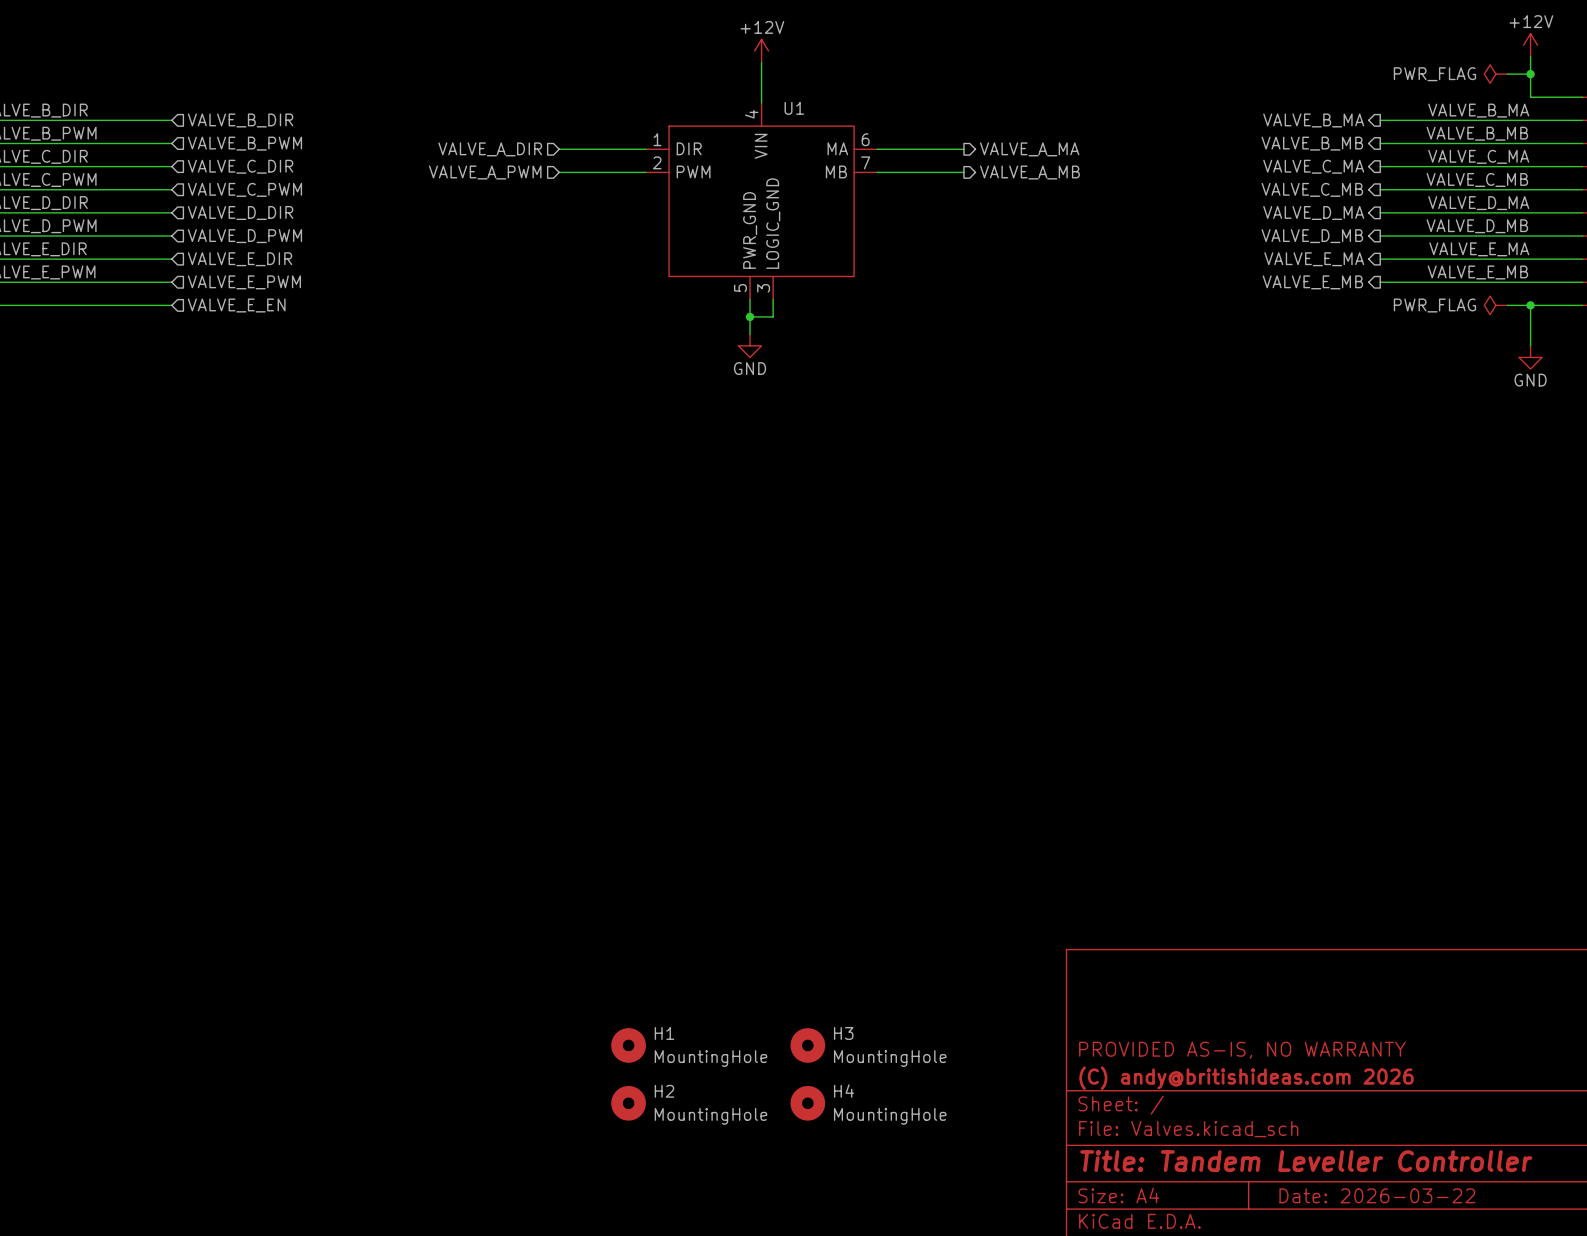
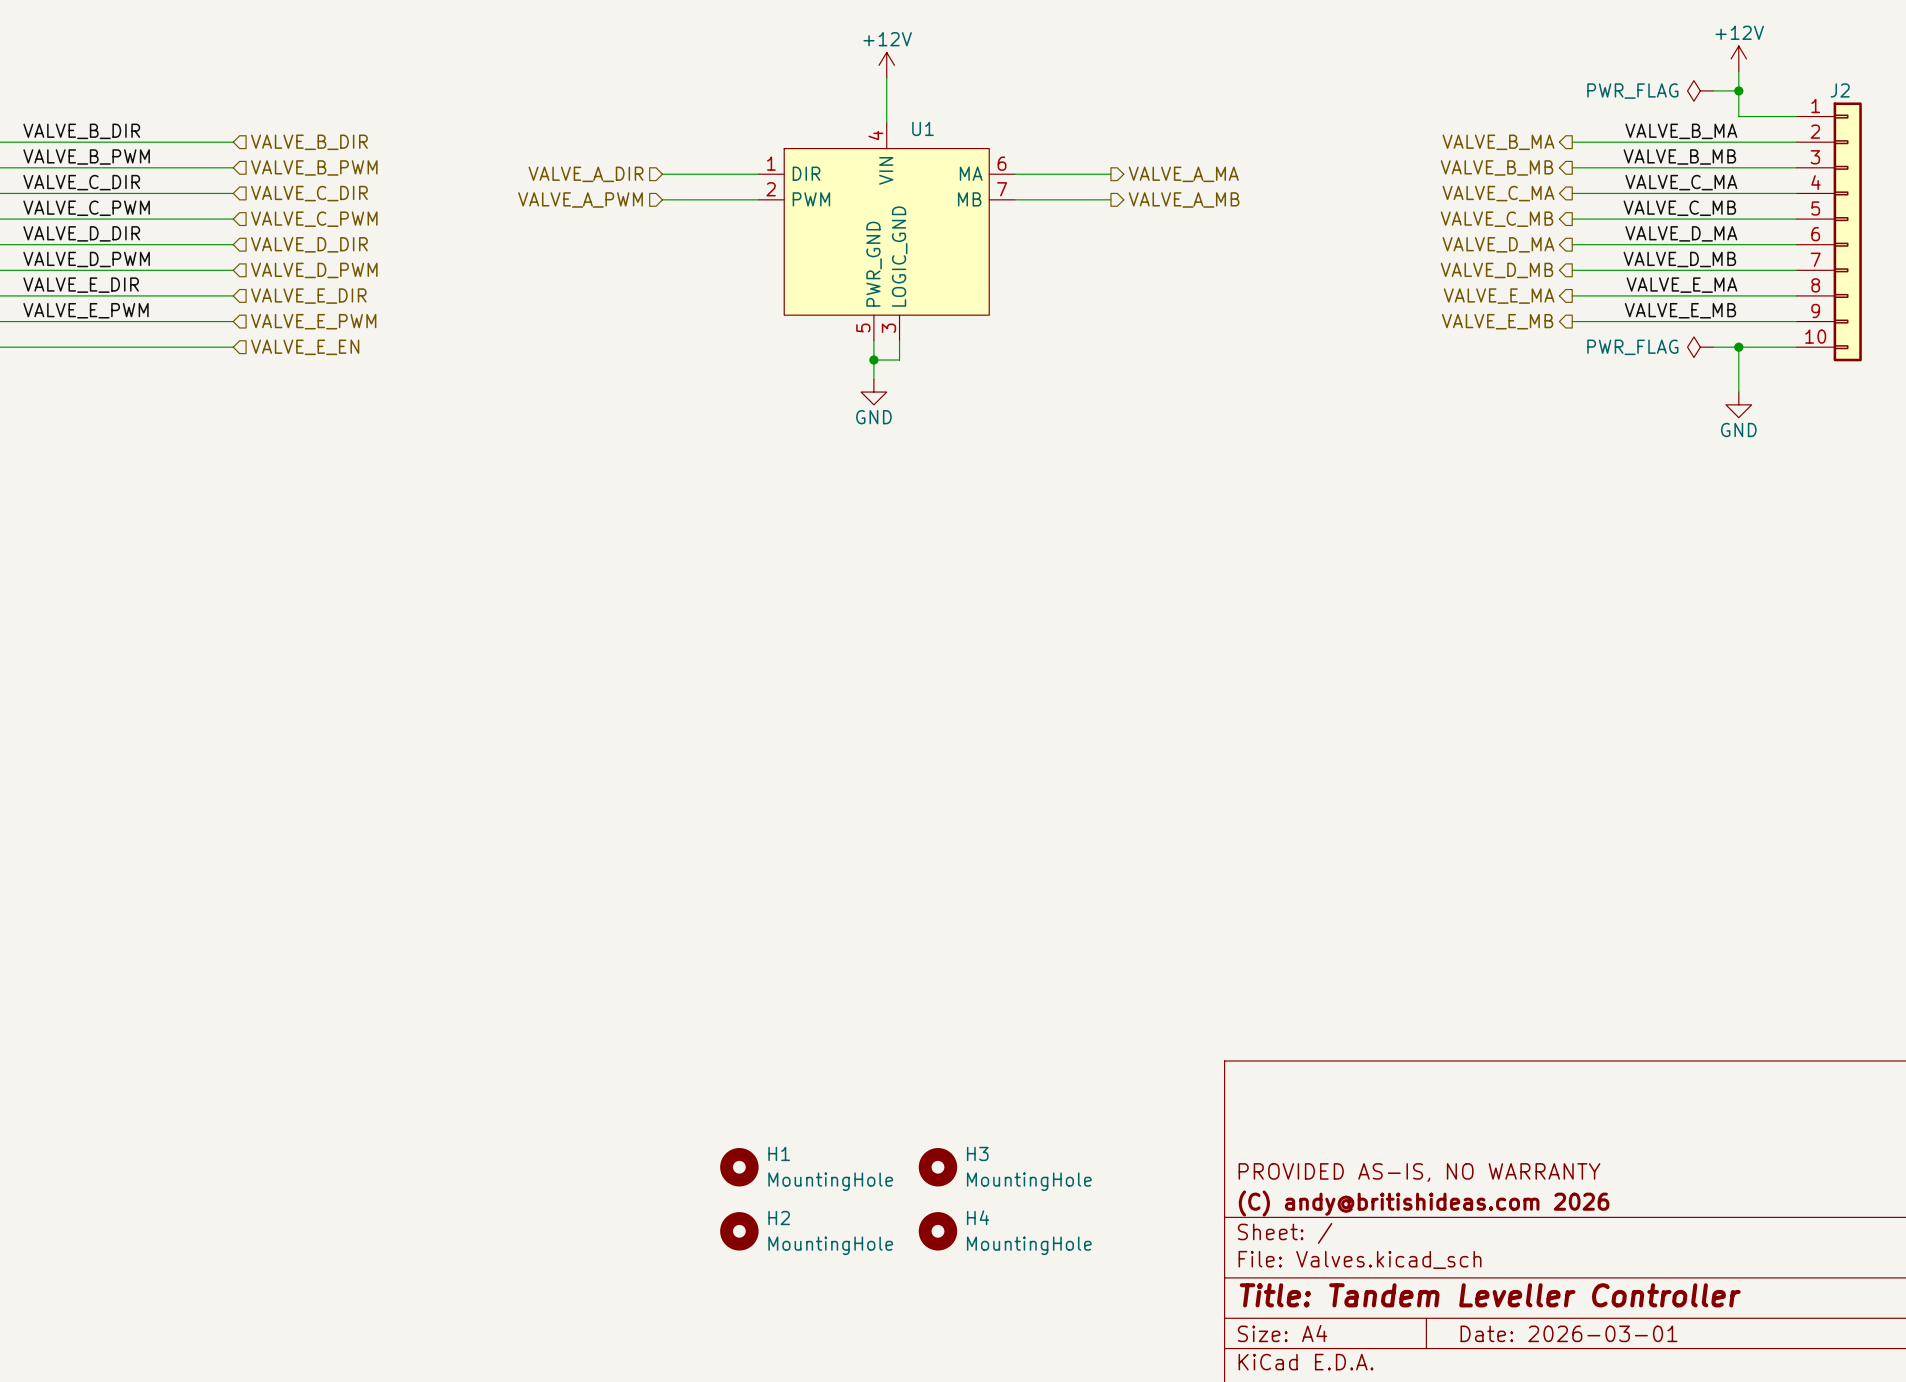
title block: Date: 2026-03-22 (1377, 1195) -> Date: 2026-03-01 (1569, 1333)

